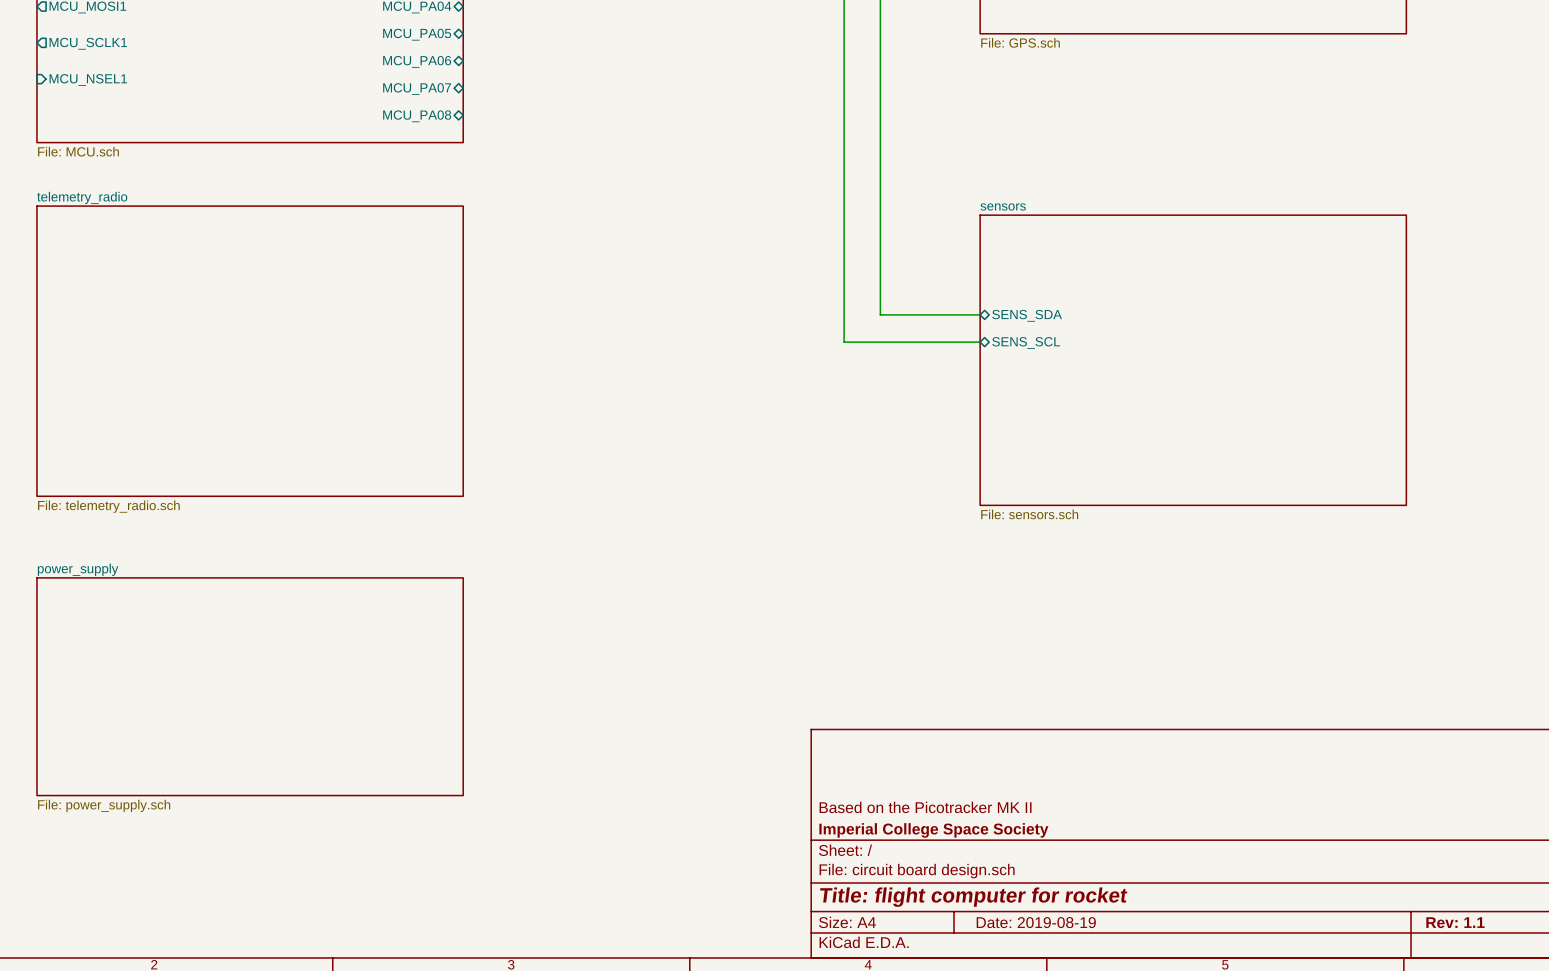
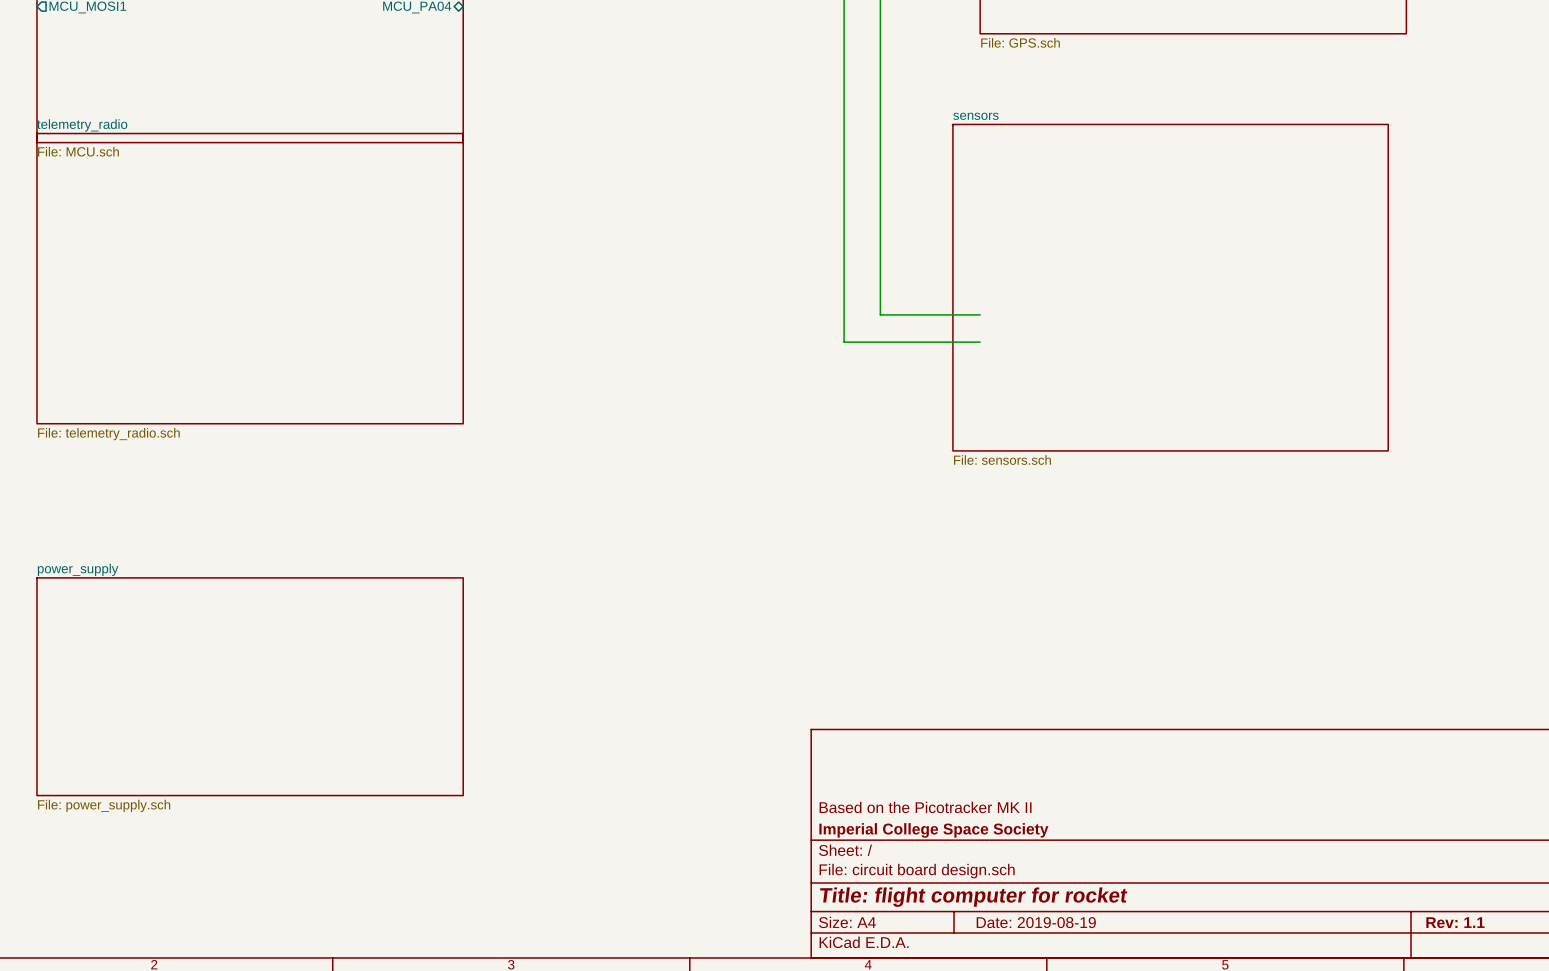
sheet pin: MCU_PA05 (417, 34) -> none
sheet pin: MCU_SCLK1 (88, 43) -> none
sheet pin: MCU_PA06 (417, 61) -> none
sheet pin: MCU_NSEL1 (88, 80) -> none
sheet pin: MCU_PA07 (417, 89) -> none
sheet pin: MCU_PA08 (417, 116) -> none
sheet sensors: none -> File: sensors.sch (1170, 287)
sheet pin: SENS_SDA (1027, 315) -> none
sheet pin: SENS_SCL (1026, 343) -> none
sheet telemetry_radio position: (250, 351) -> (250, 278)
sheet sensors: File: sensors.sch (1193, 360) -> none

